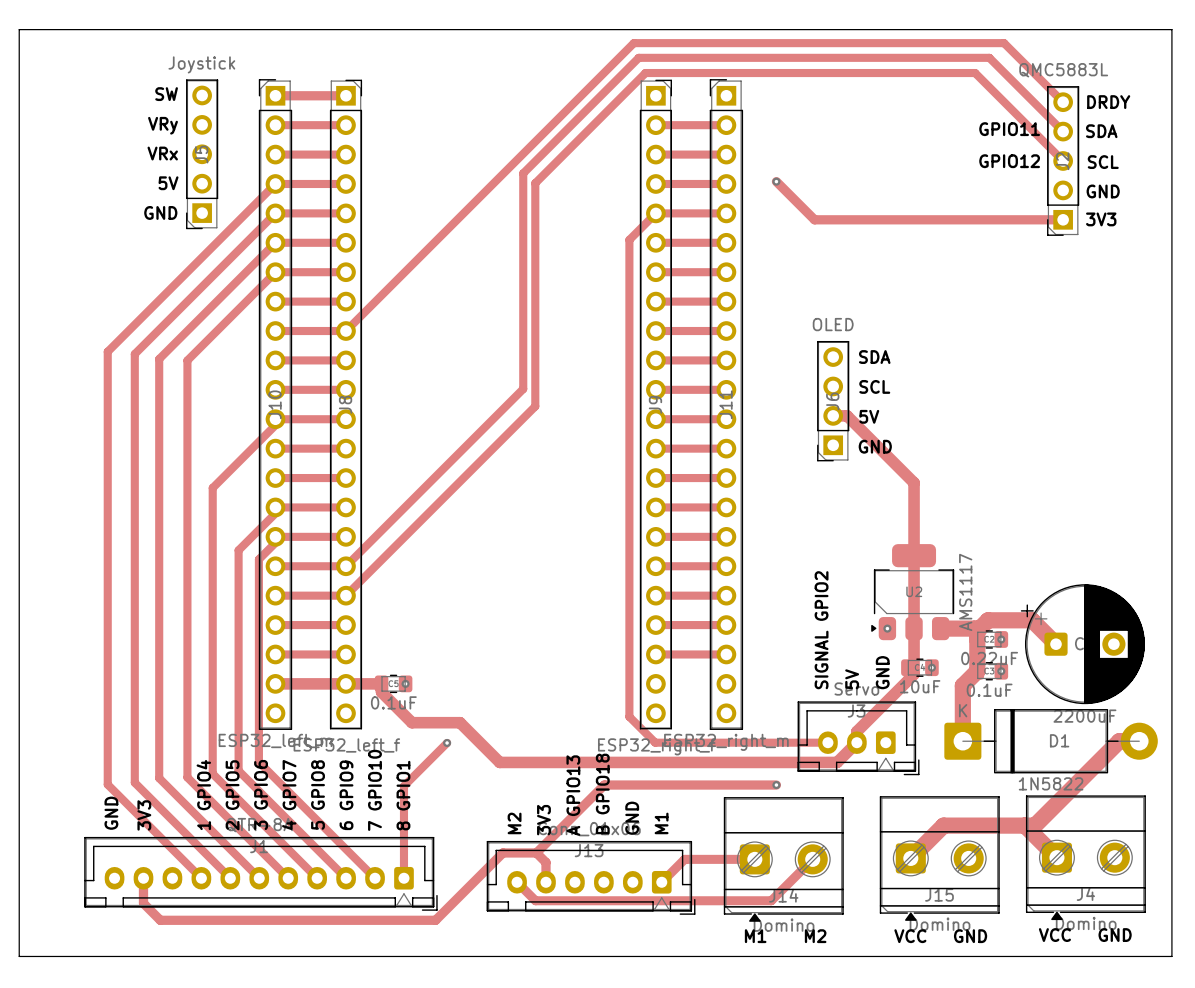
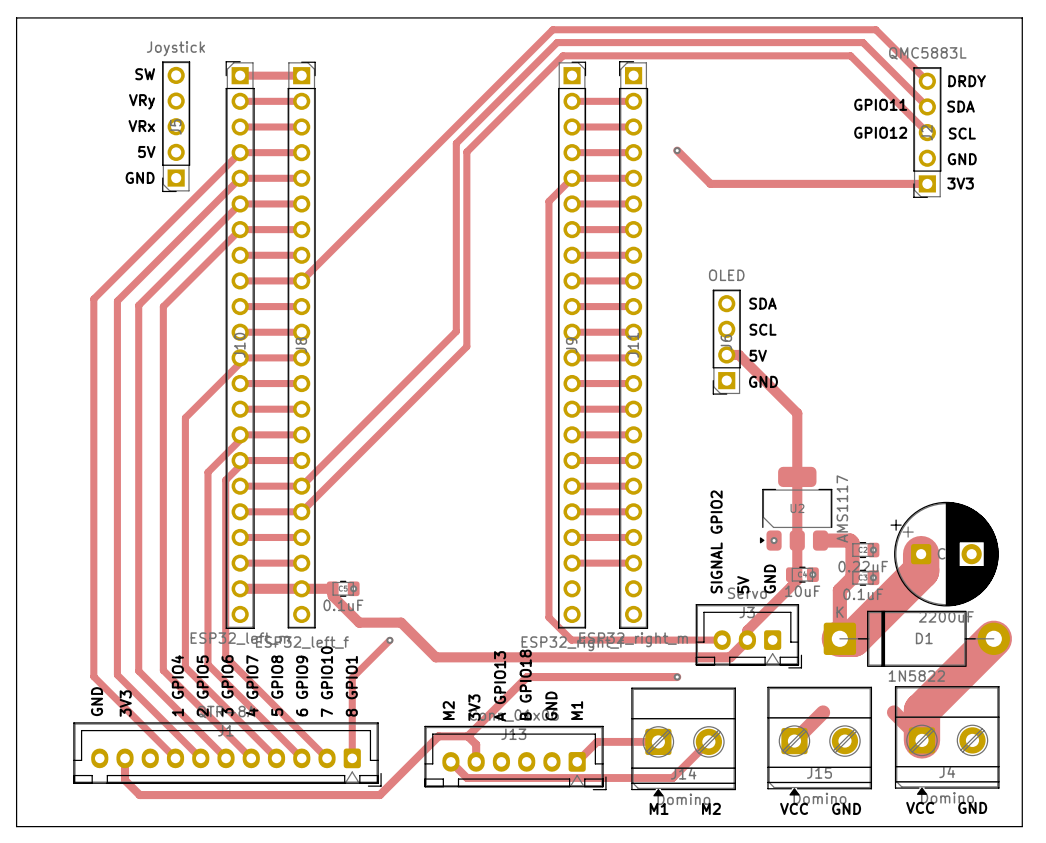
track: (977, 631) (988, 620) (1032, 620) (1056, 644) -> (839, 638) (853, 638) (921, 570) (921, 554)
track: (1139, 741) (1119, 741) (1034, 825) (943, 825) -> (993, 638) (921, 710) (921, 740)

